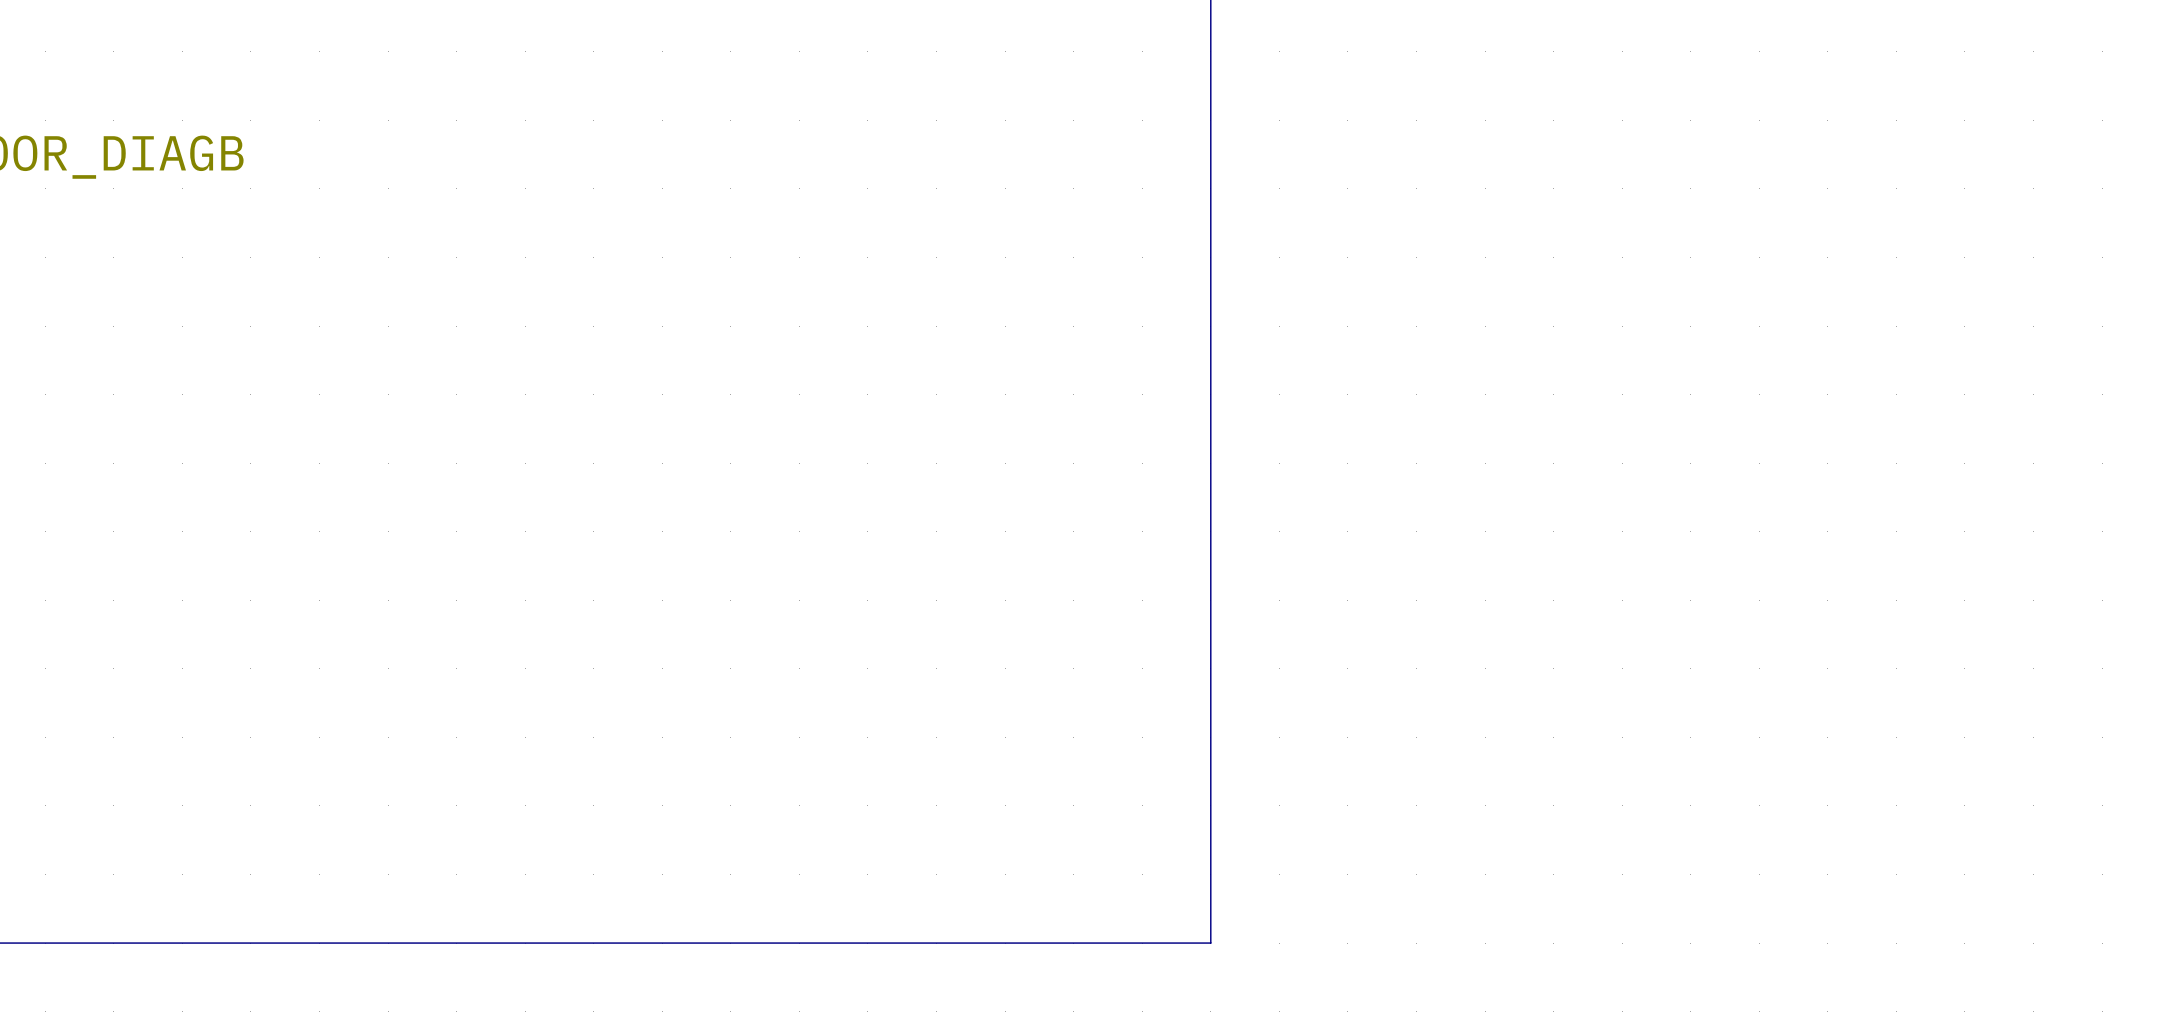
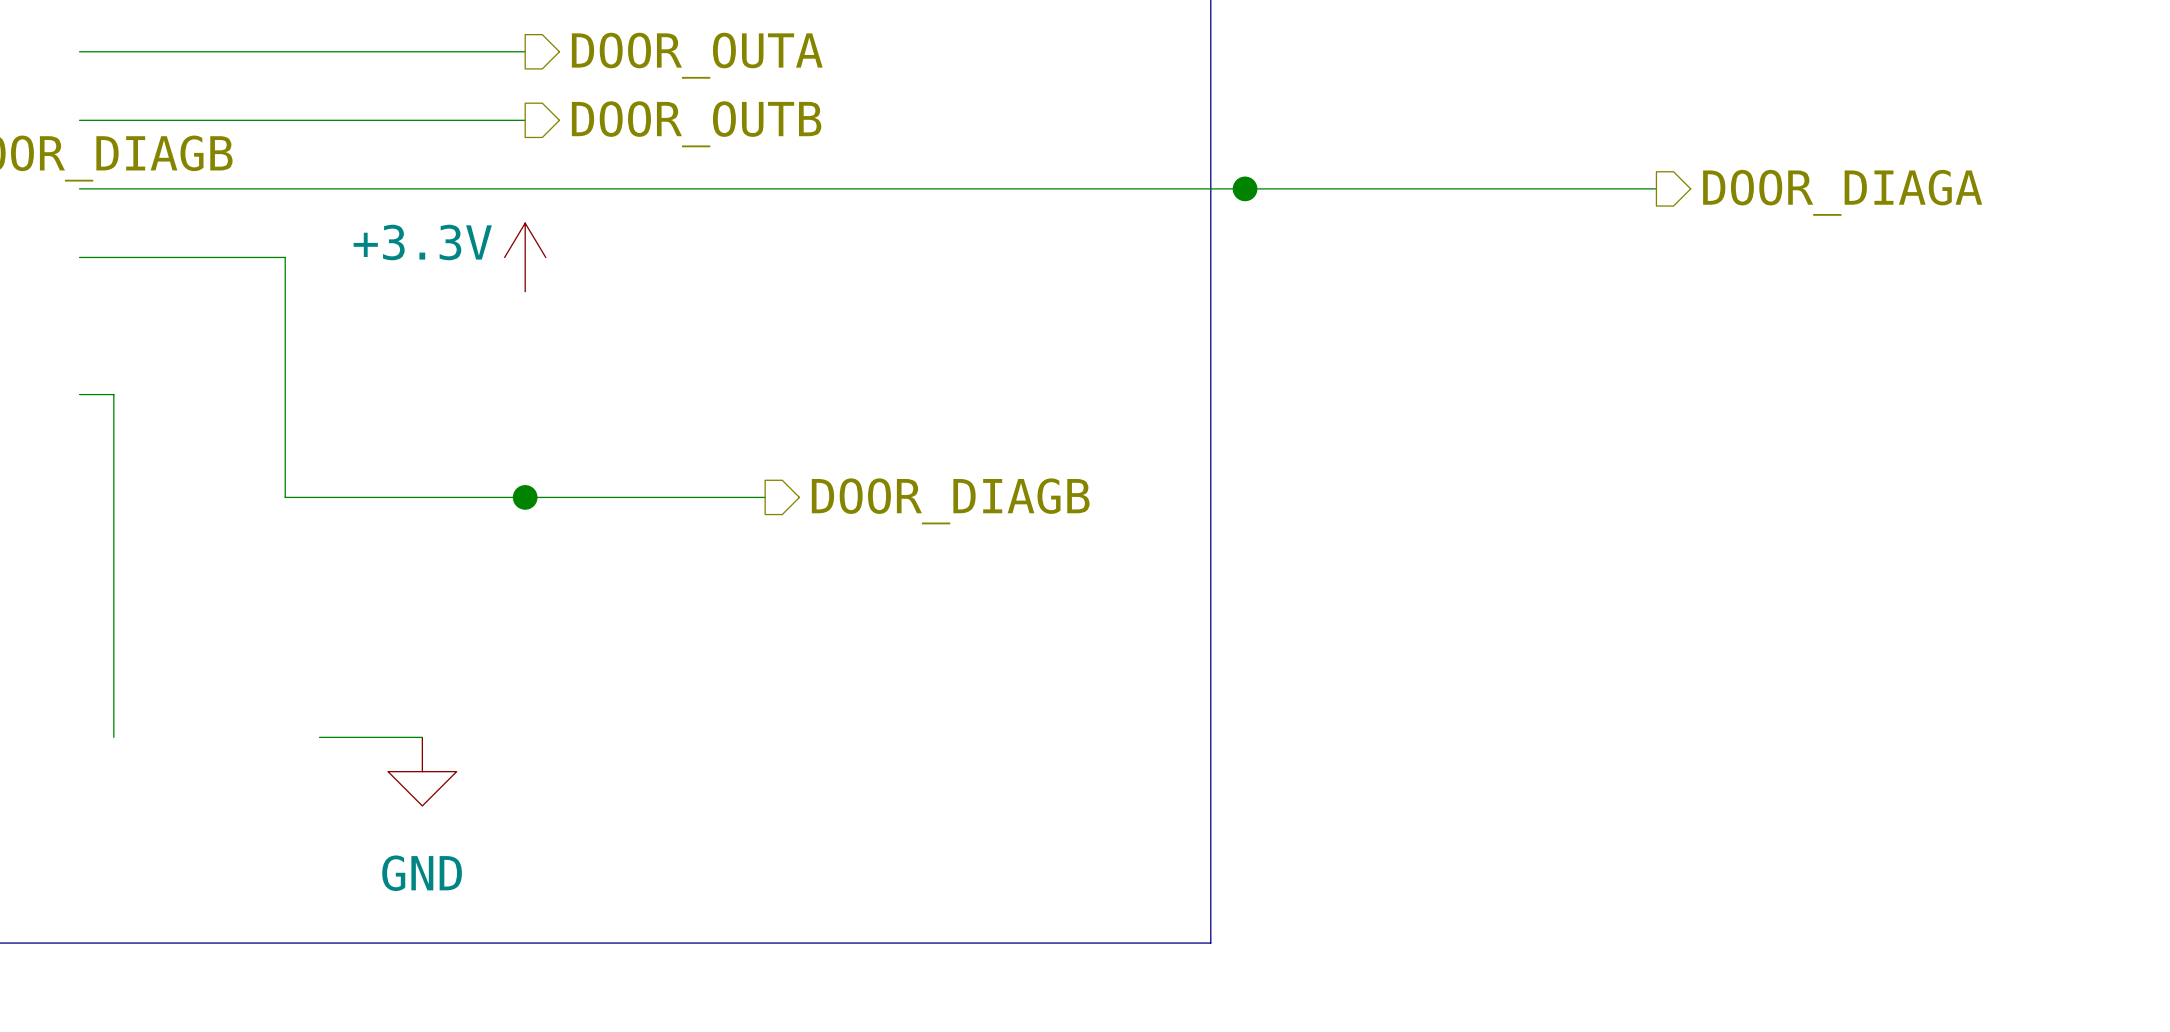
wire: none -> (79, 51) (525, 51)
hierarchical label: none -> DOOR_OUTA (697, 55)
wire: none -> (79, 120) (525, 120)
hierarchical label: none -> DOOR_OUTB (696, 124)
wire: none -> (79, 188) (1656, 188)
junction: none -> (1245, 188)
hierarchical label: none -> DOOR_DIAGA (1842, 192)
wire: none -> (79, 257) (285, 257) (285, 497) (765, 497)
power symbol: none -> +3.3V (525, 257)
wire: none -> (79, 394) (113, 394) (113, 737)
junction: none -> (525, 497)
hierarchical label: none -> DOOR_DIAGB (950, 501)
wire: none -> (319, 737) (422, 737)
power symbol: none -> GND (422, 771)

